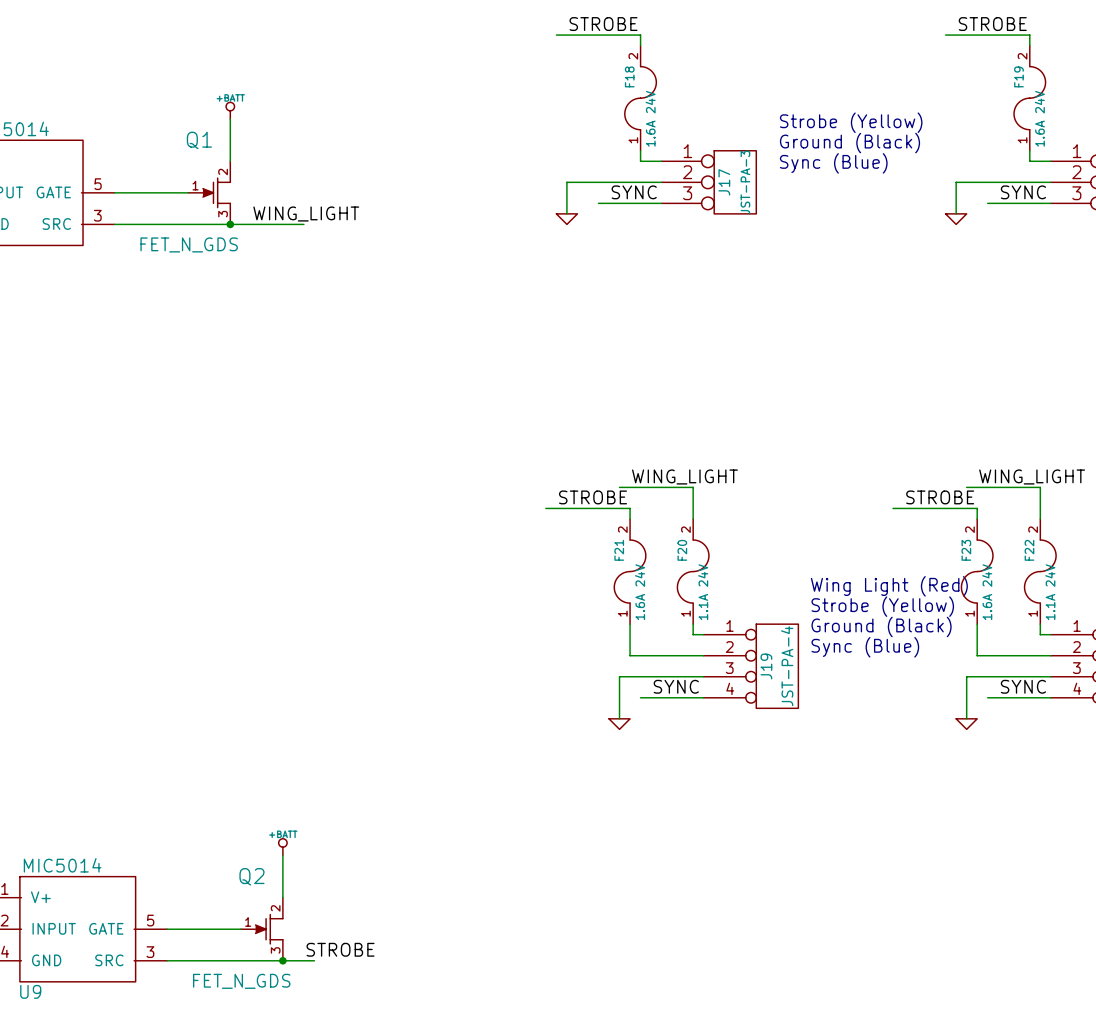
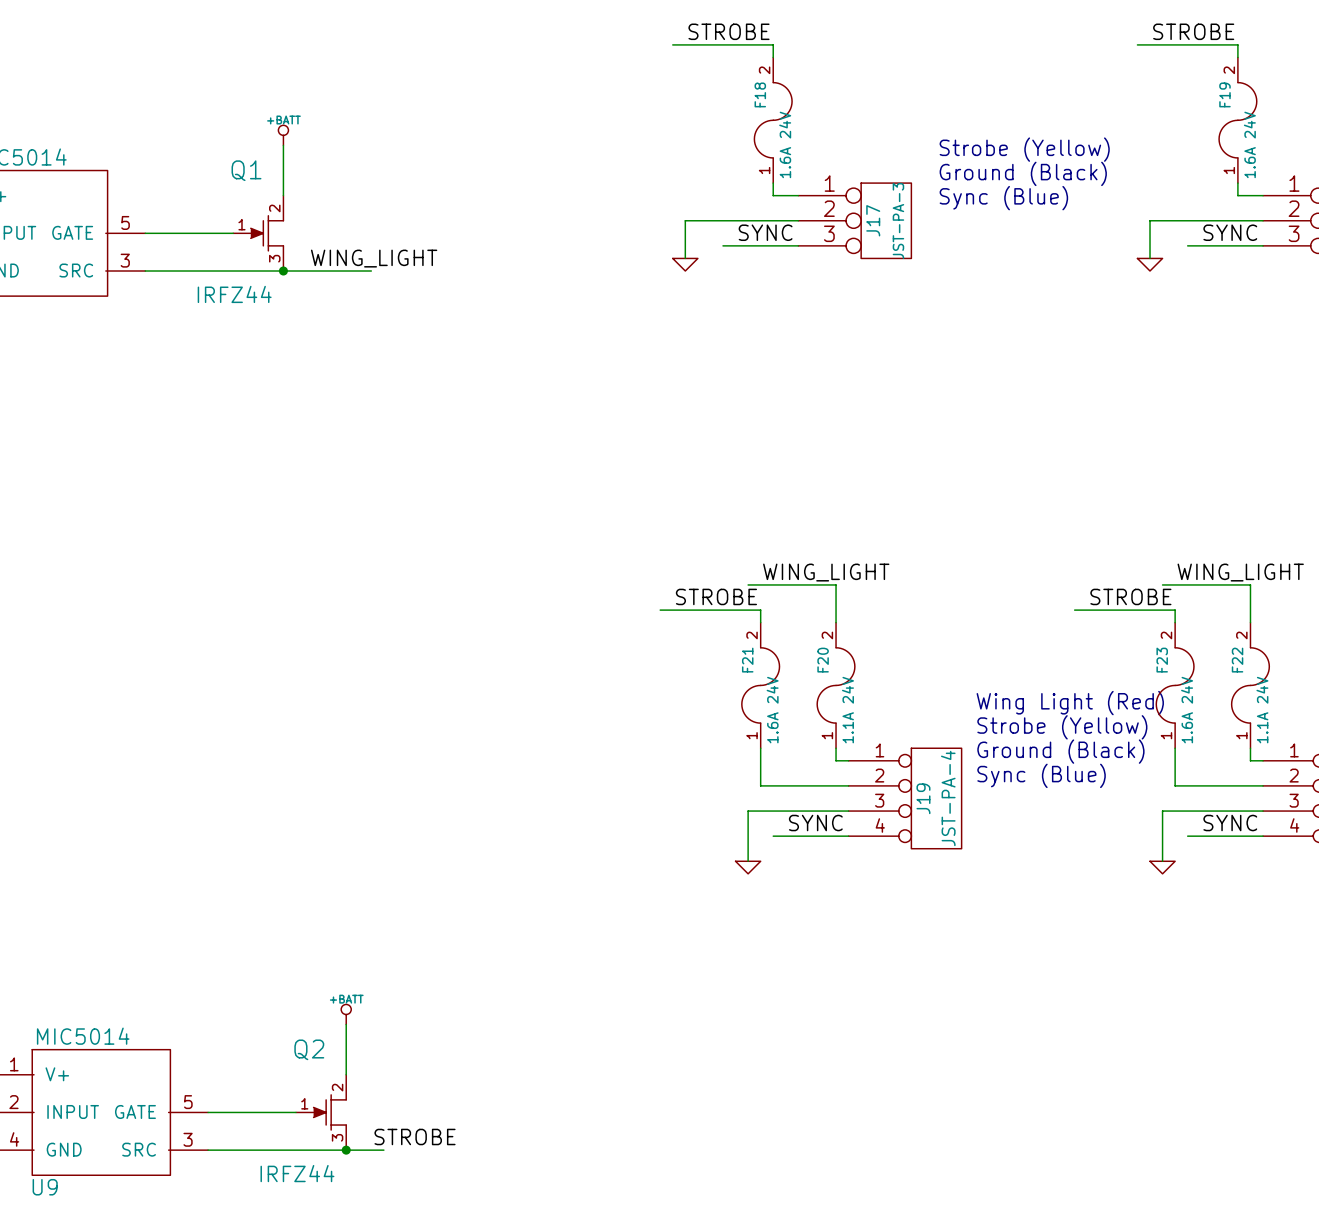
Q1 value: FET_N_GDS (189, 244) -> IRFZ44 (234, 294)
Q2 value: FET_N_GDS (241, 981) -> IRFZ44 (297, 1173)

